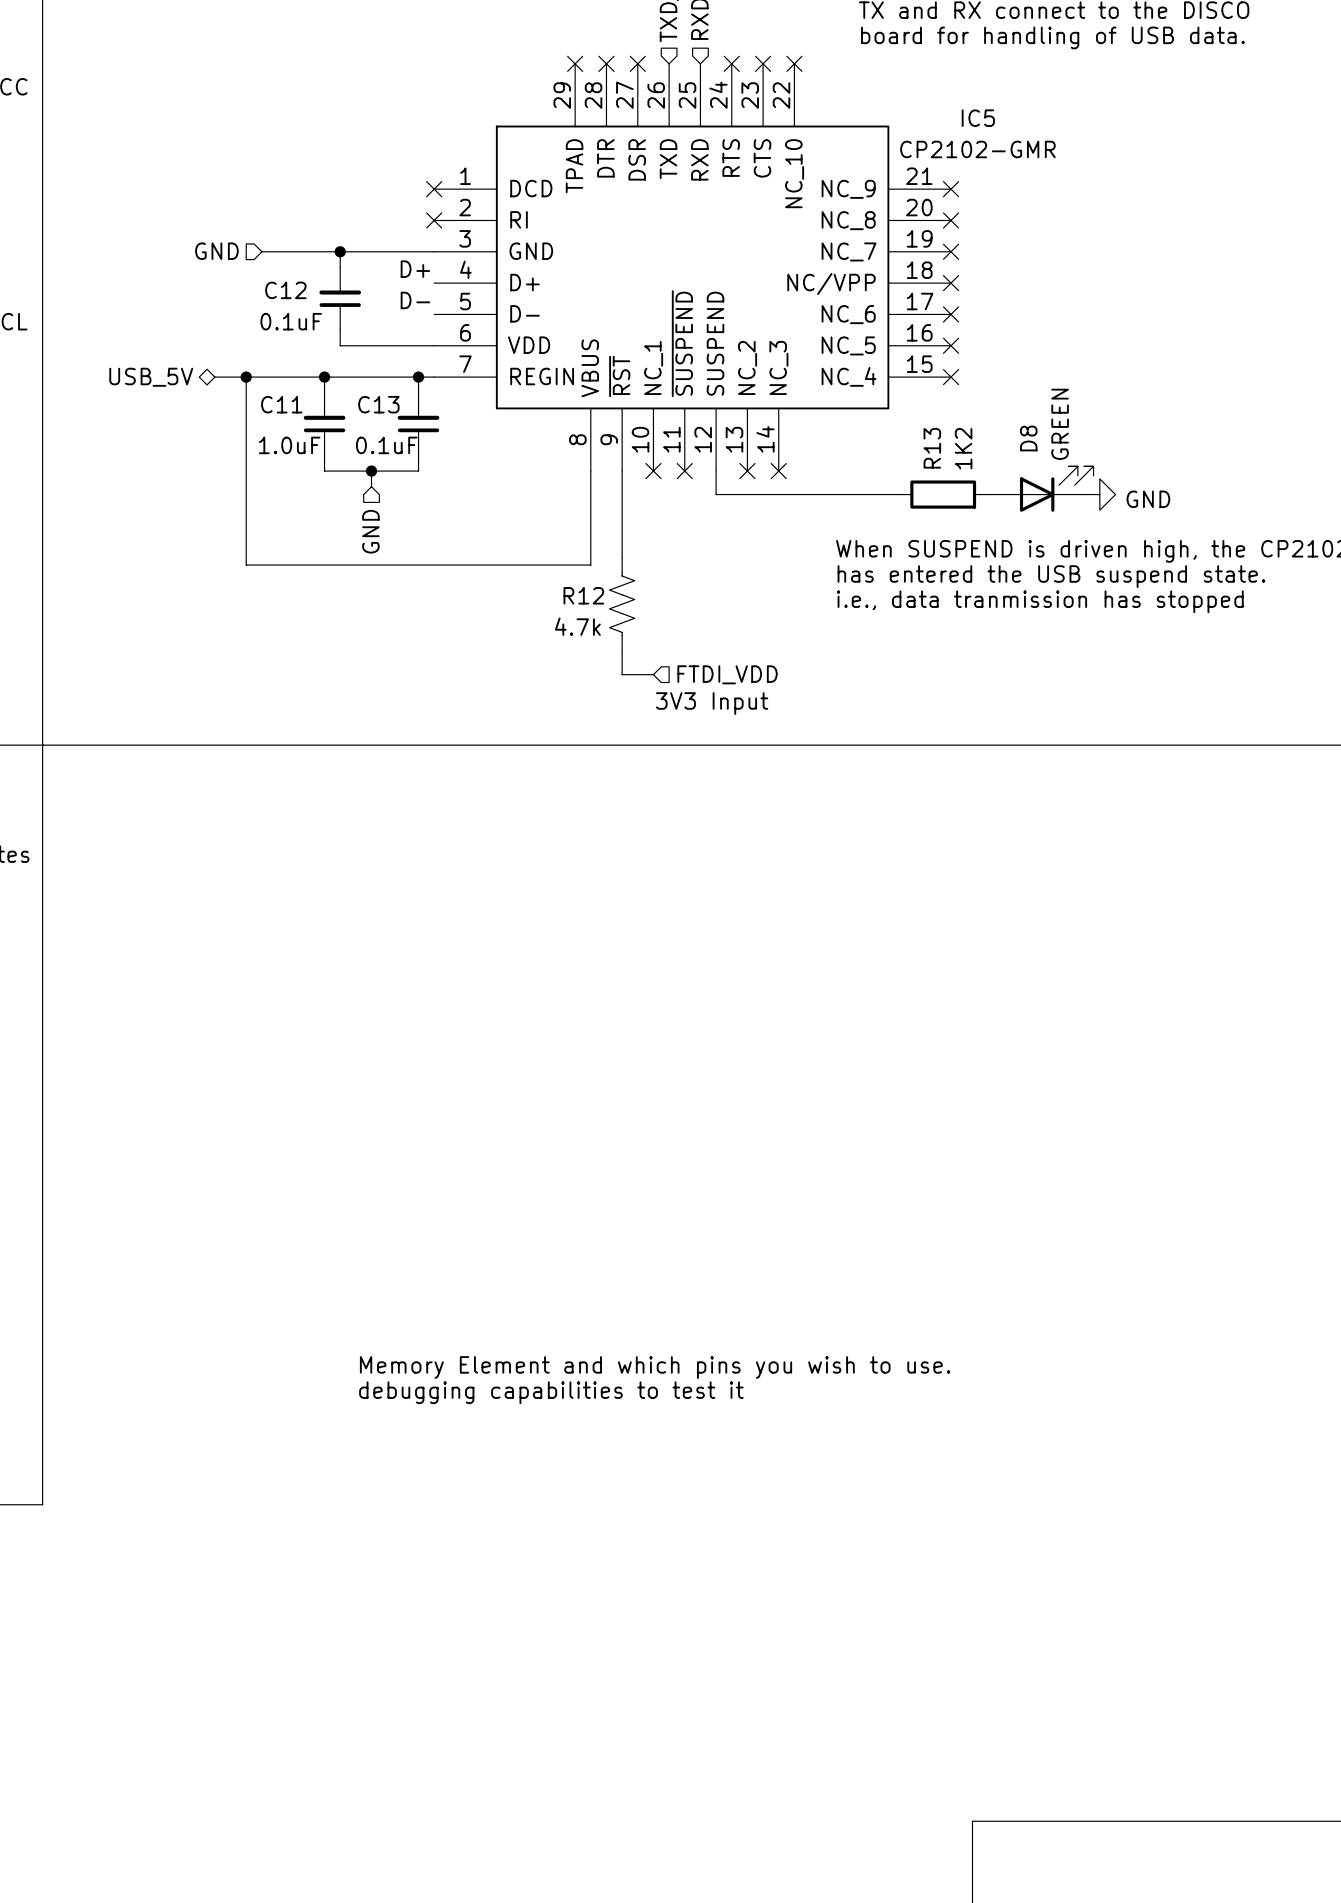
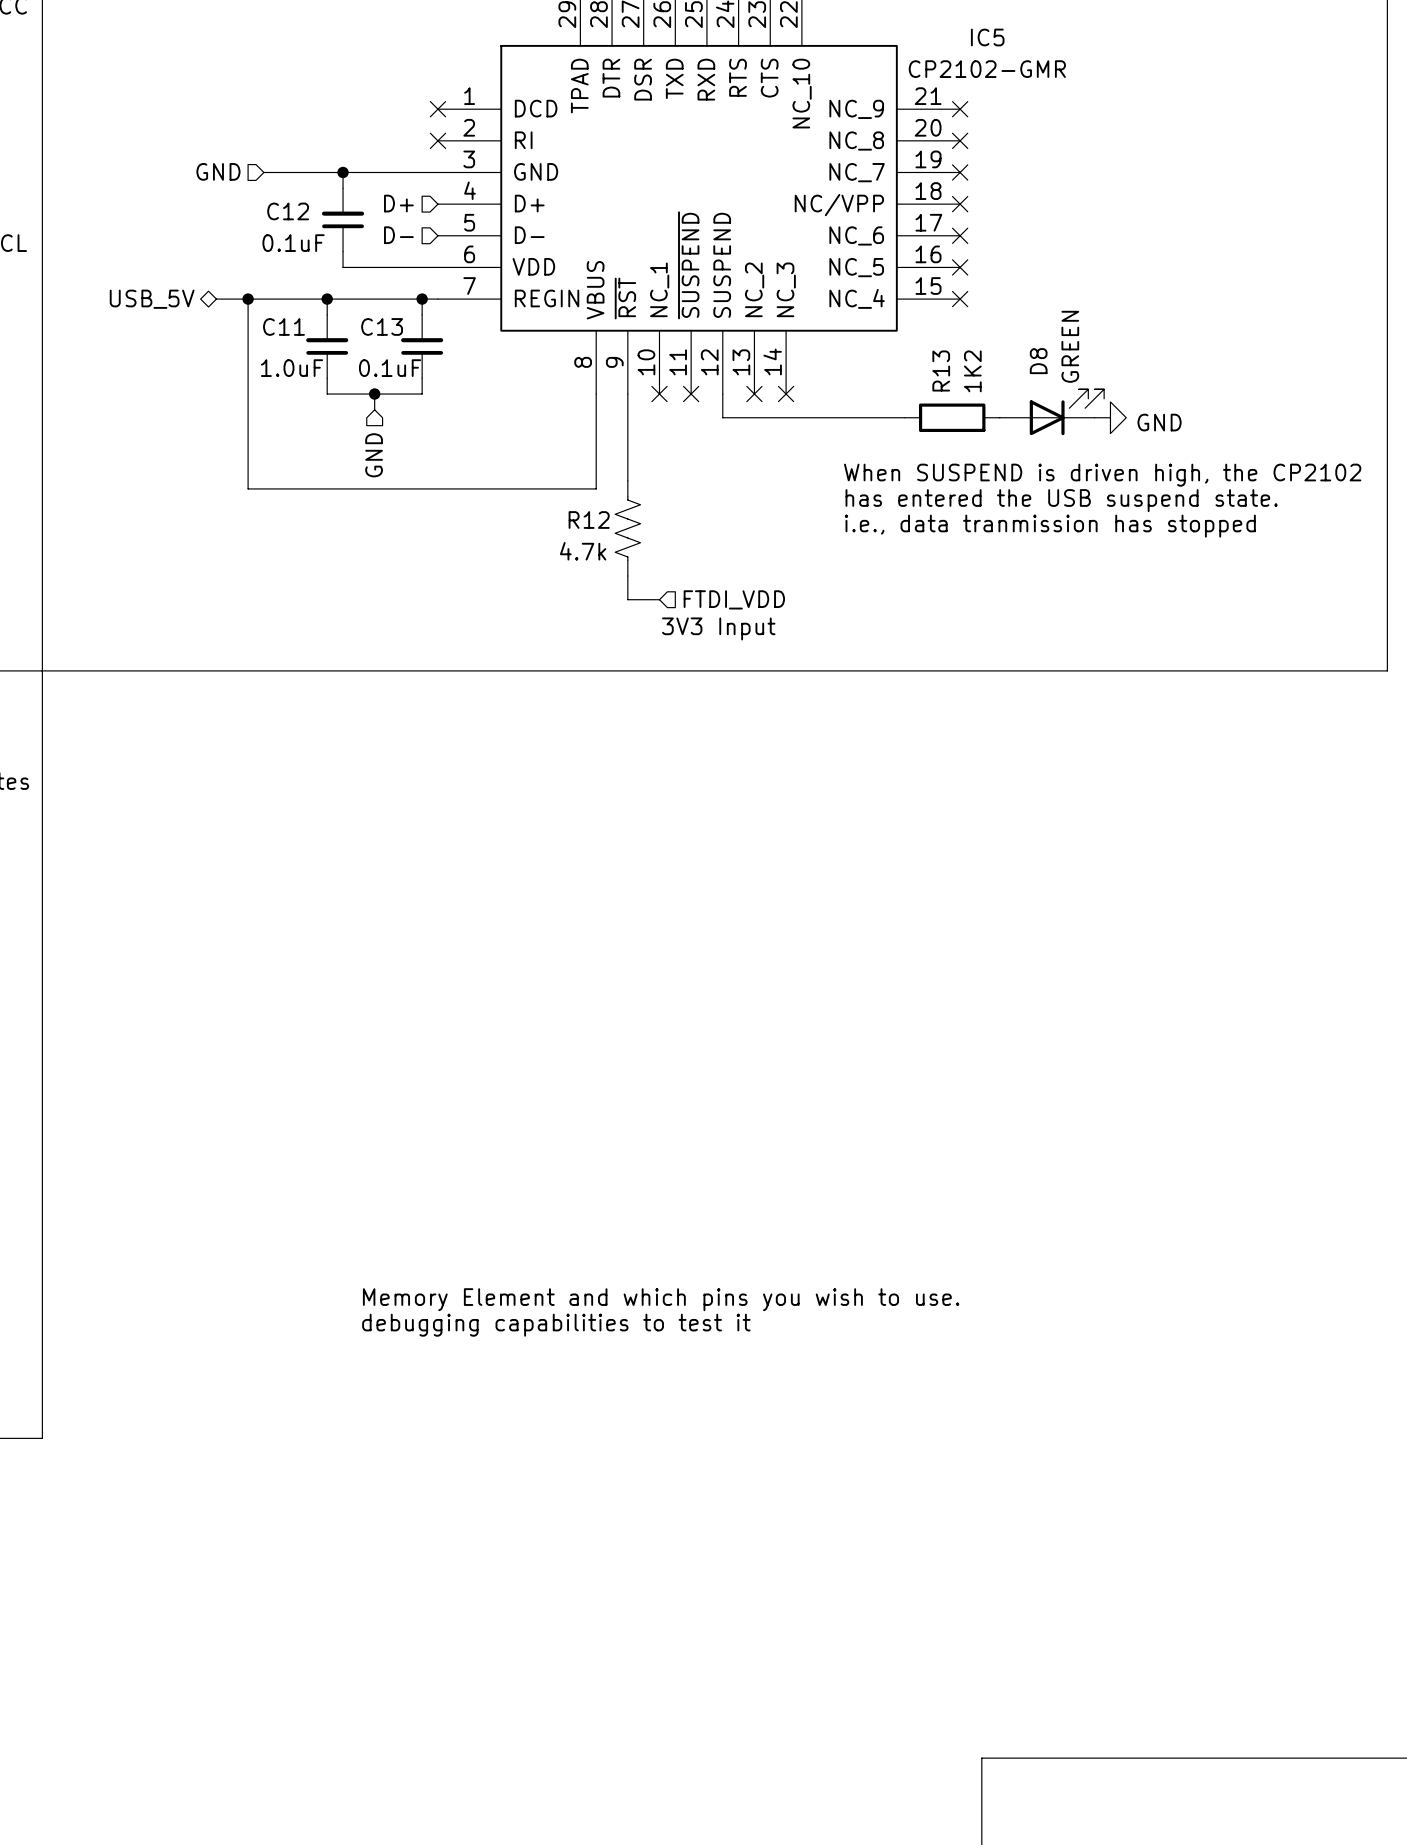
label: D+ (415, 269) -> none
hierarchical label: none -> D+ (398, 203)
label: D- (415, 300) -> none
hierarchical label: none -> D- (398, 235)

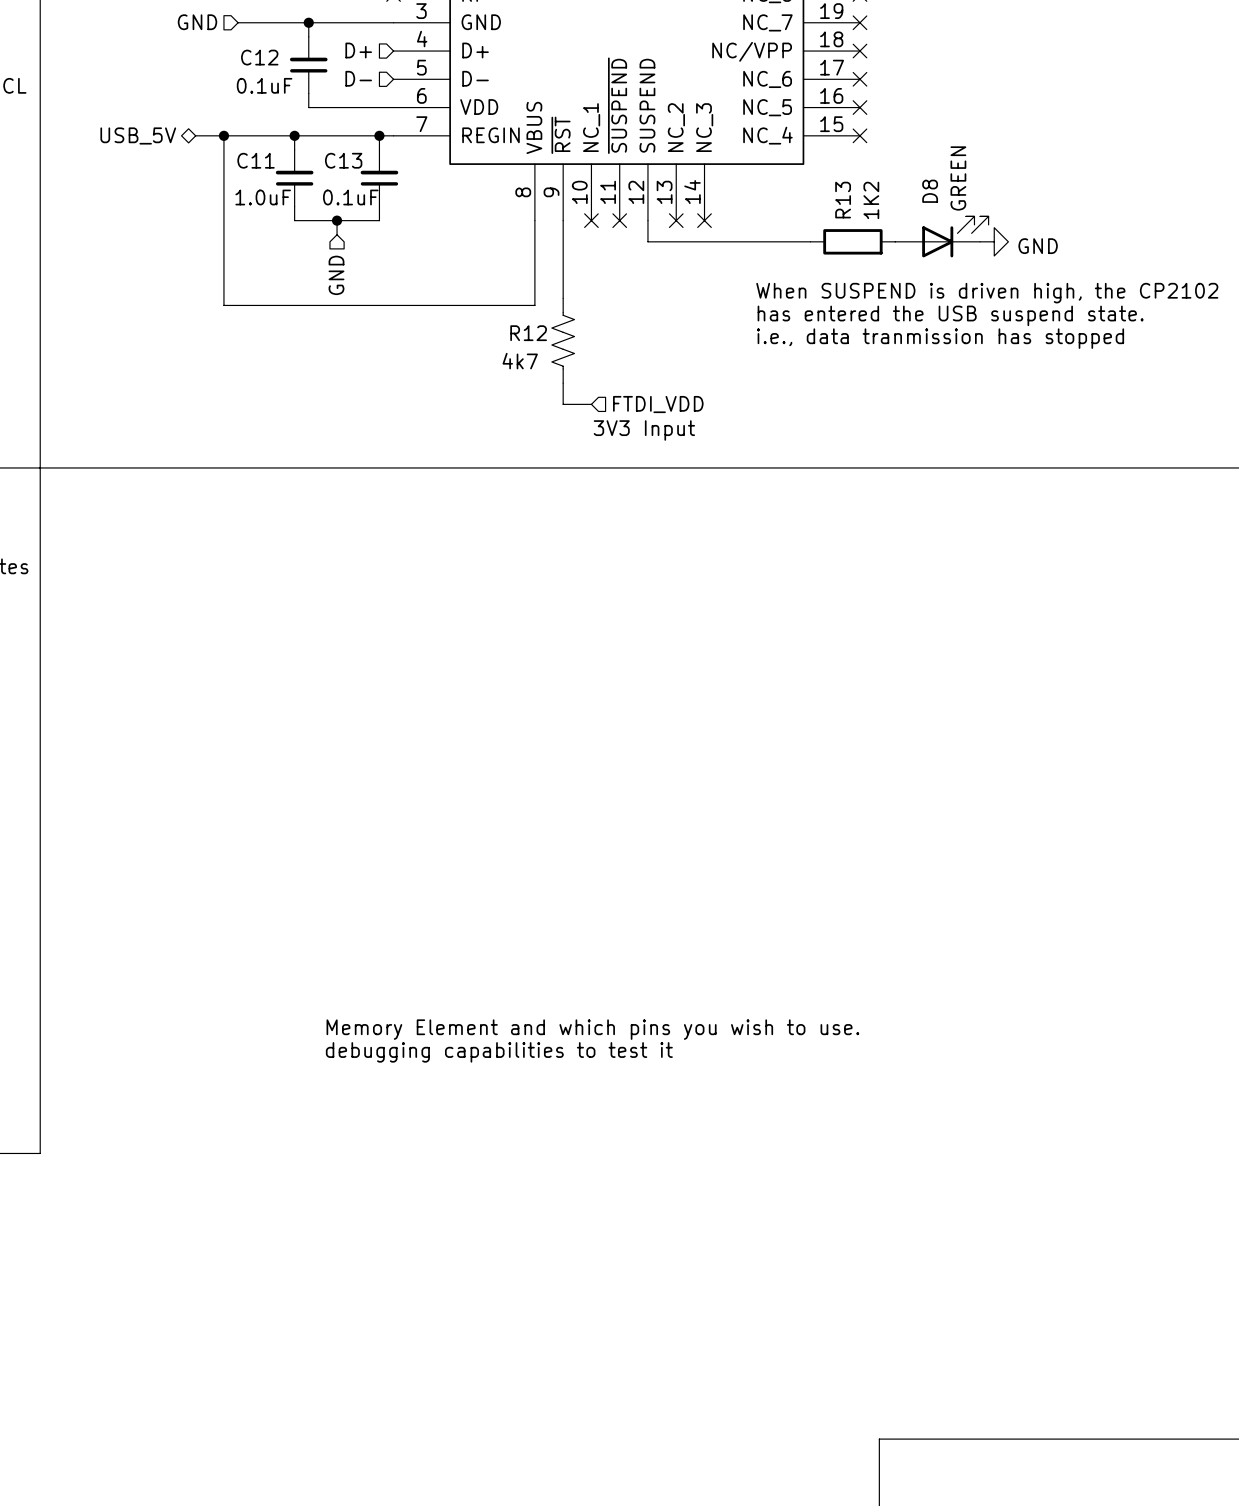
R12 value: 4.7k (583, 551) -> 4k7 (520, 361)

